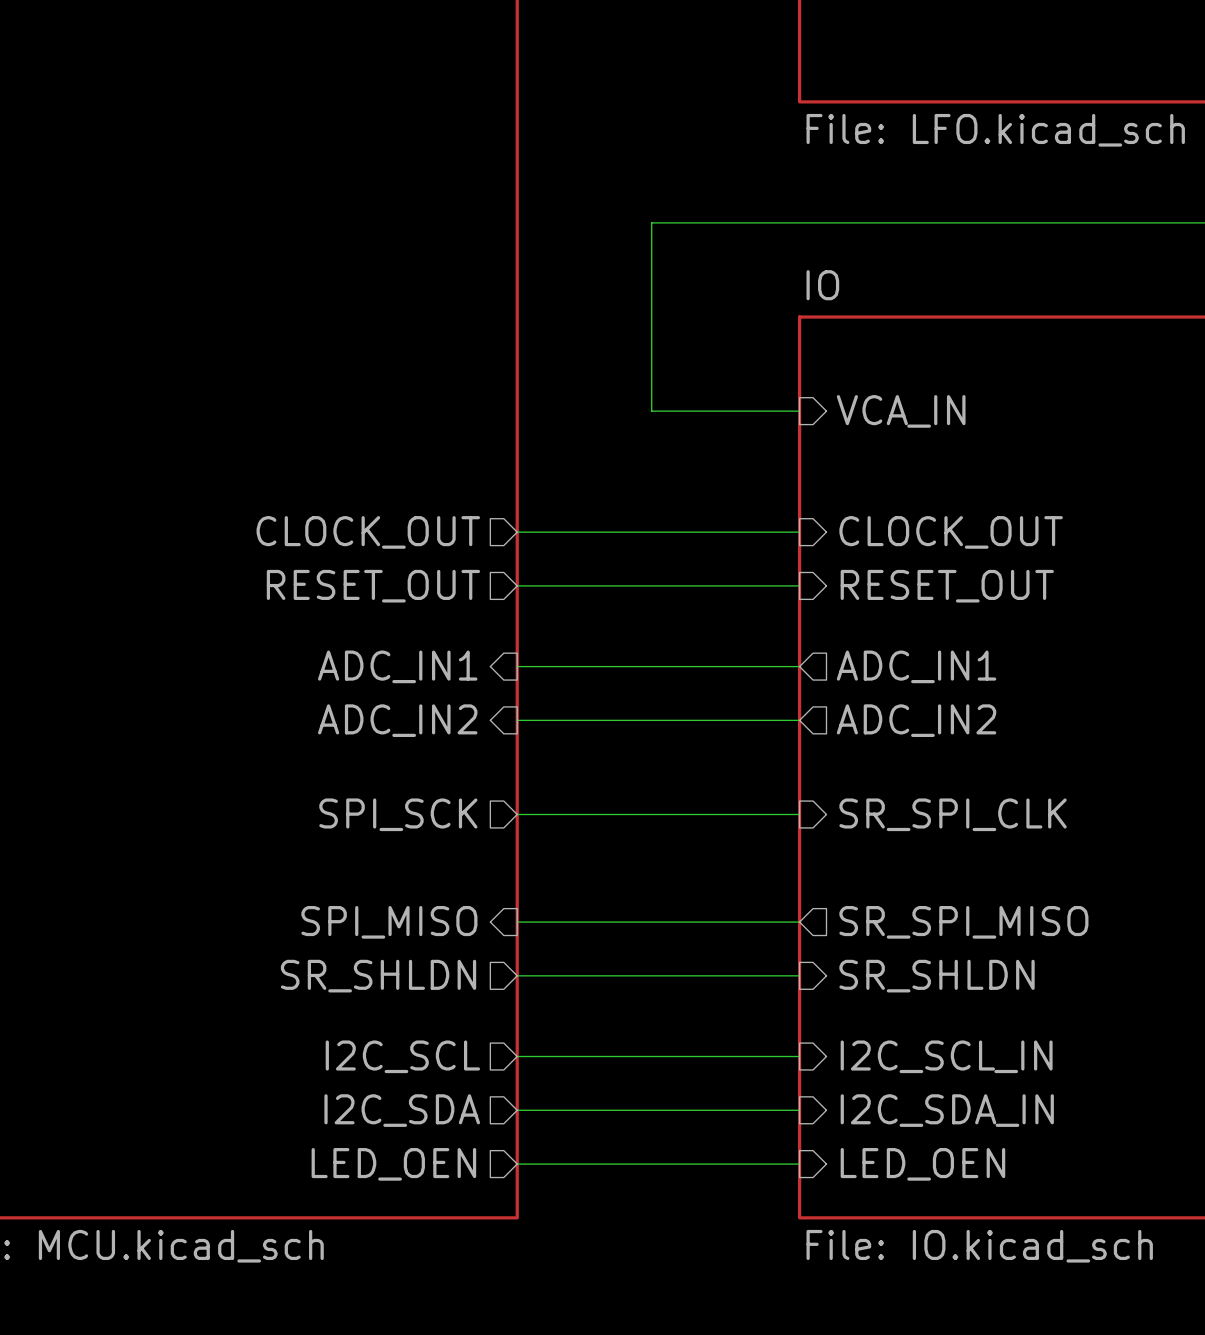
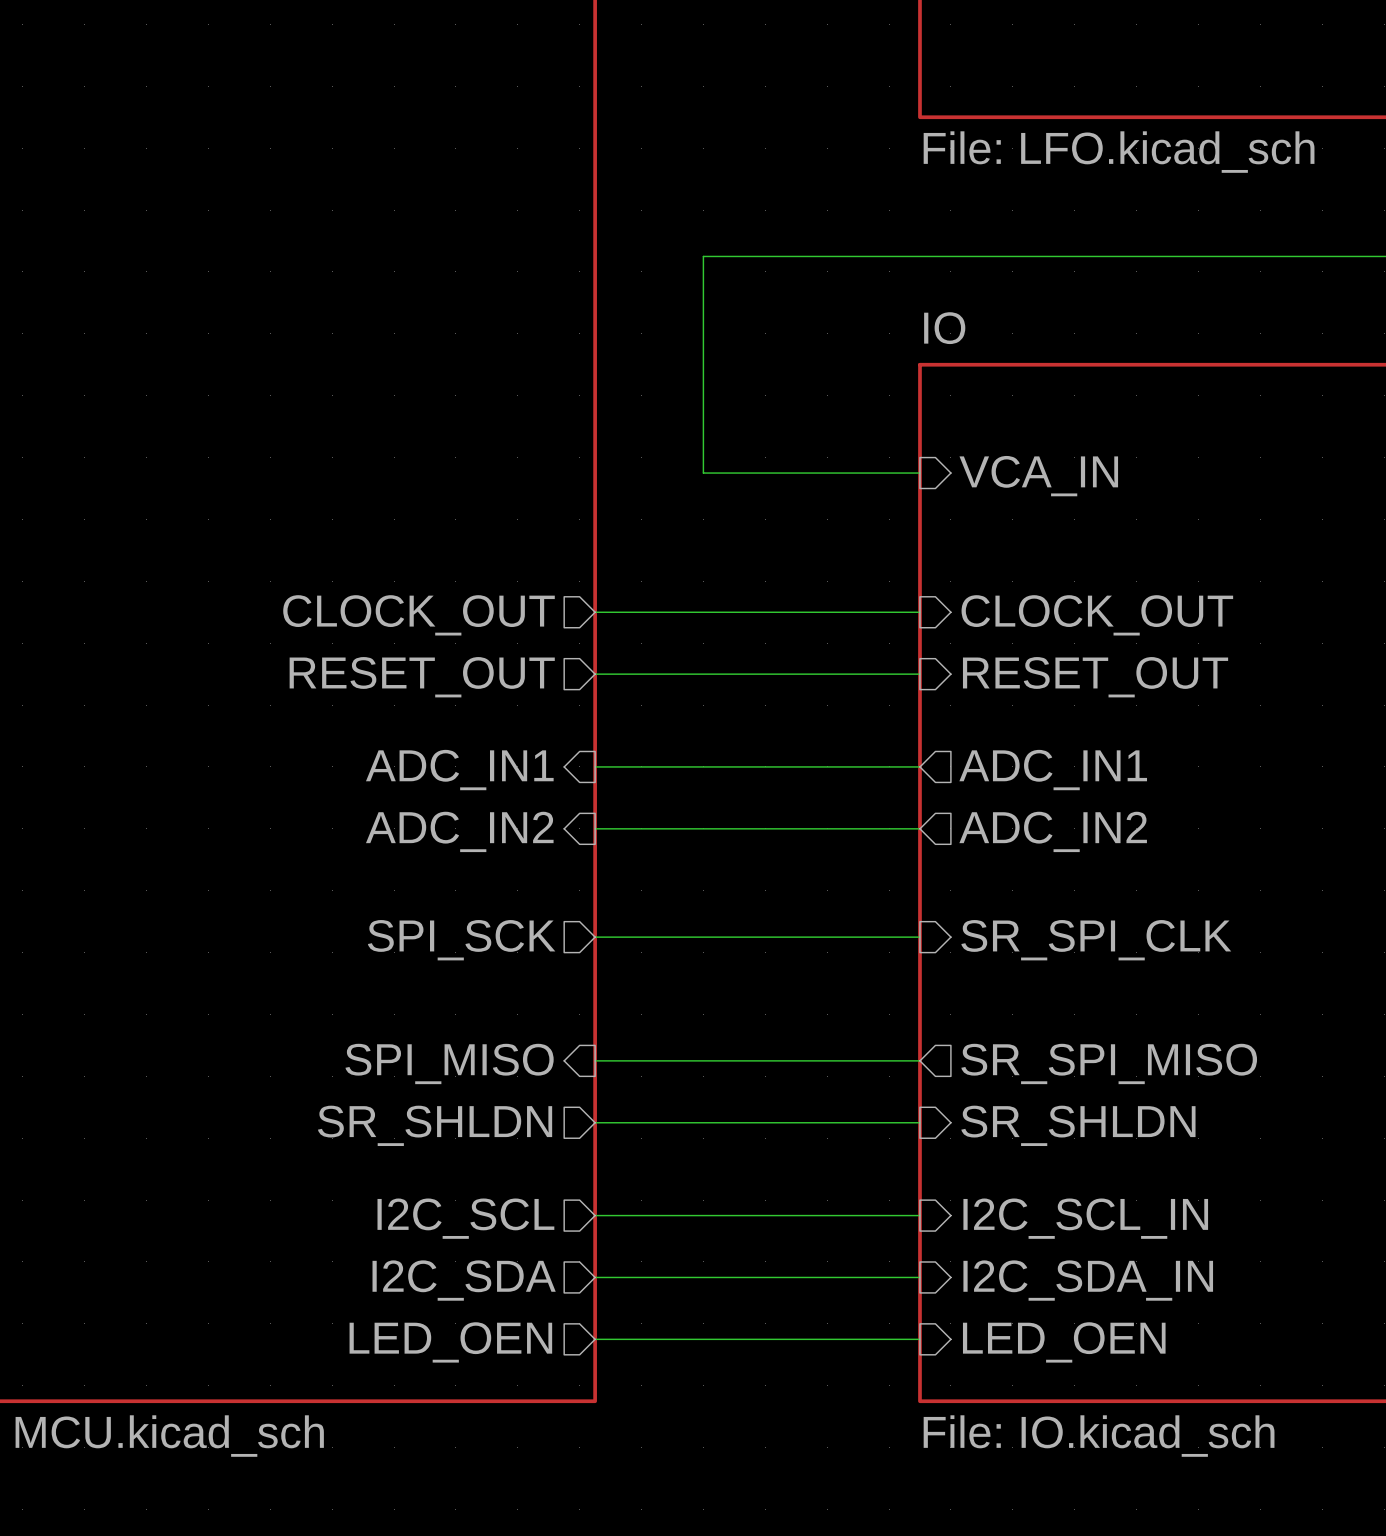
wire: (651, 222) (651, 411) -> (749, 256) (703, 256) (703, 473) (749, 473)

